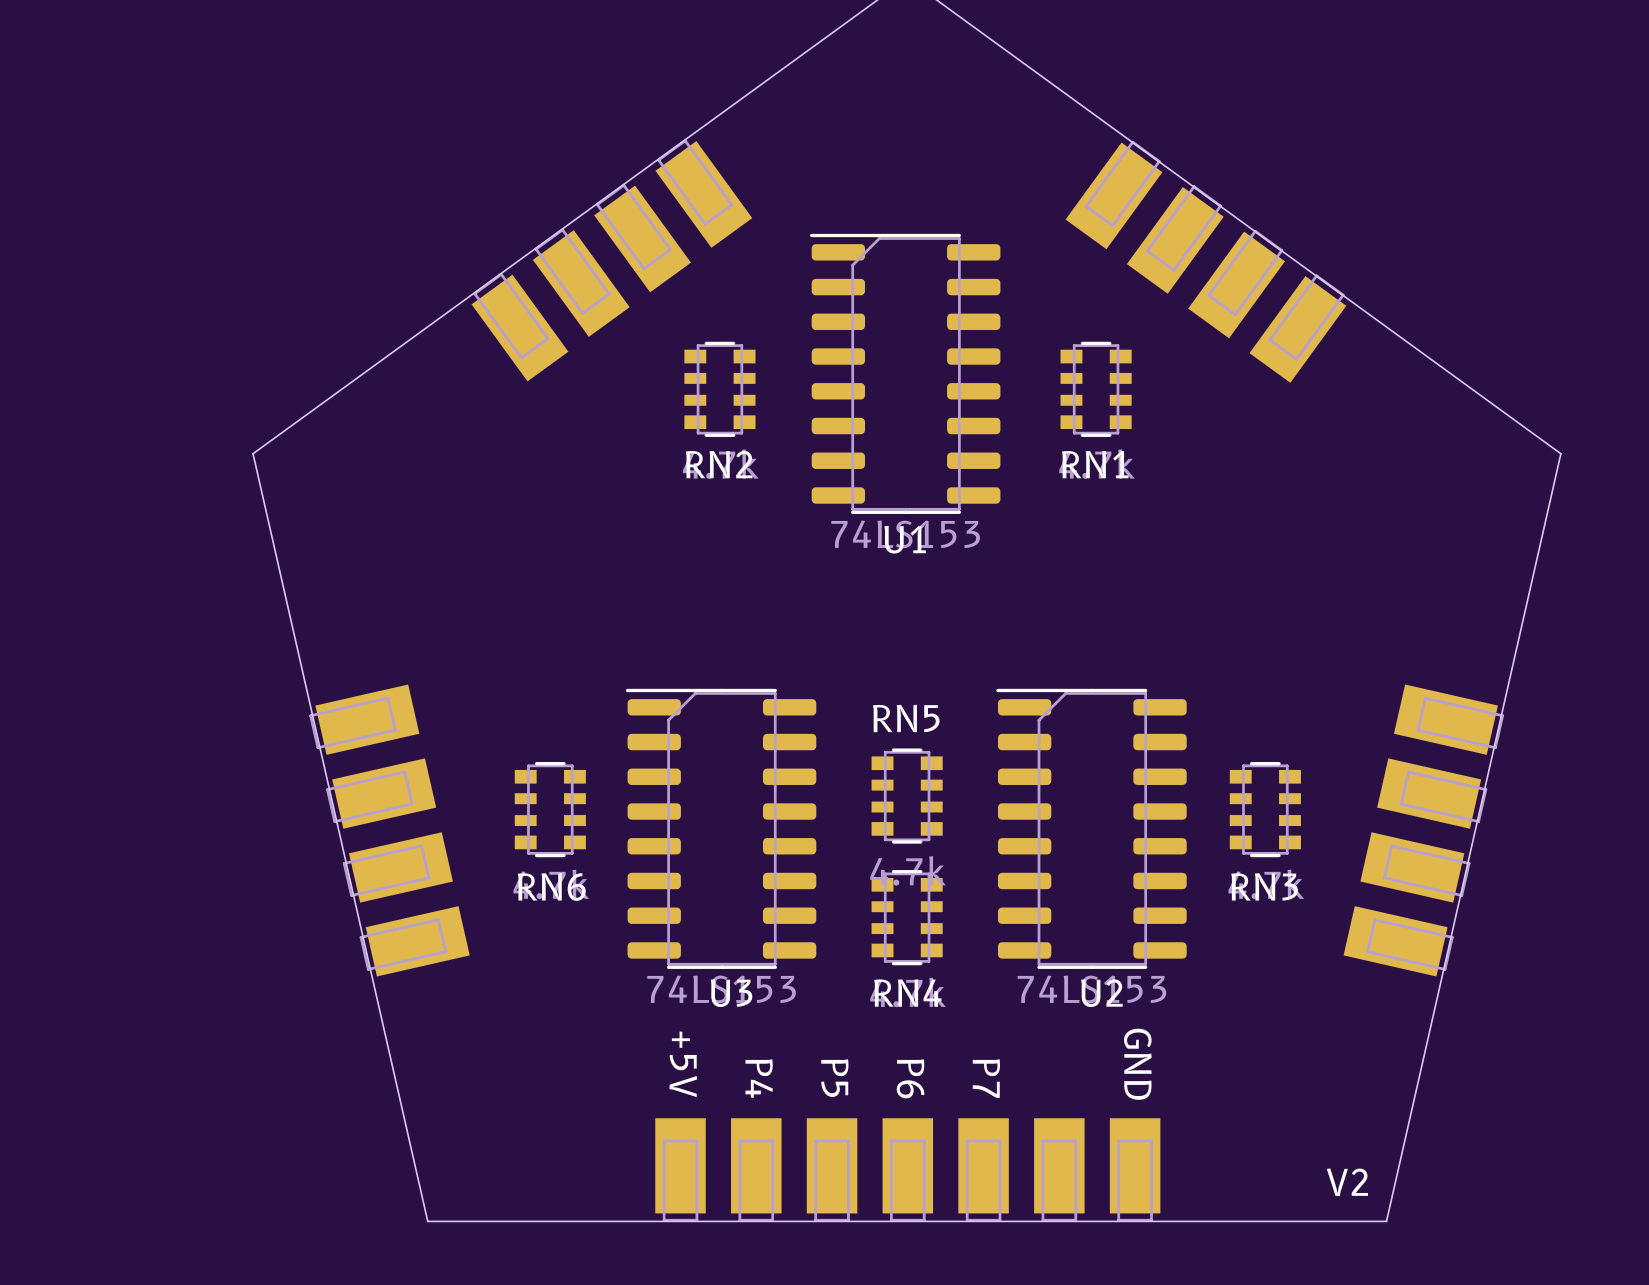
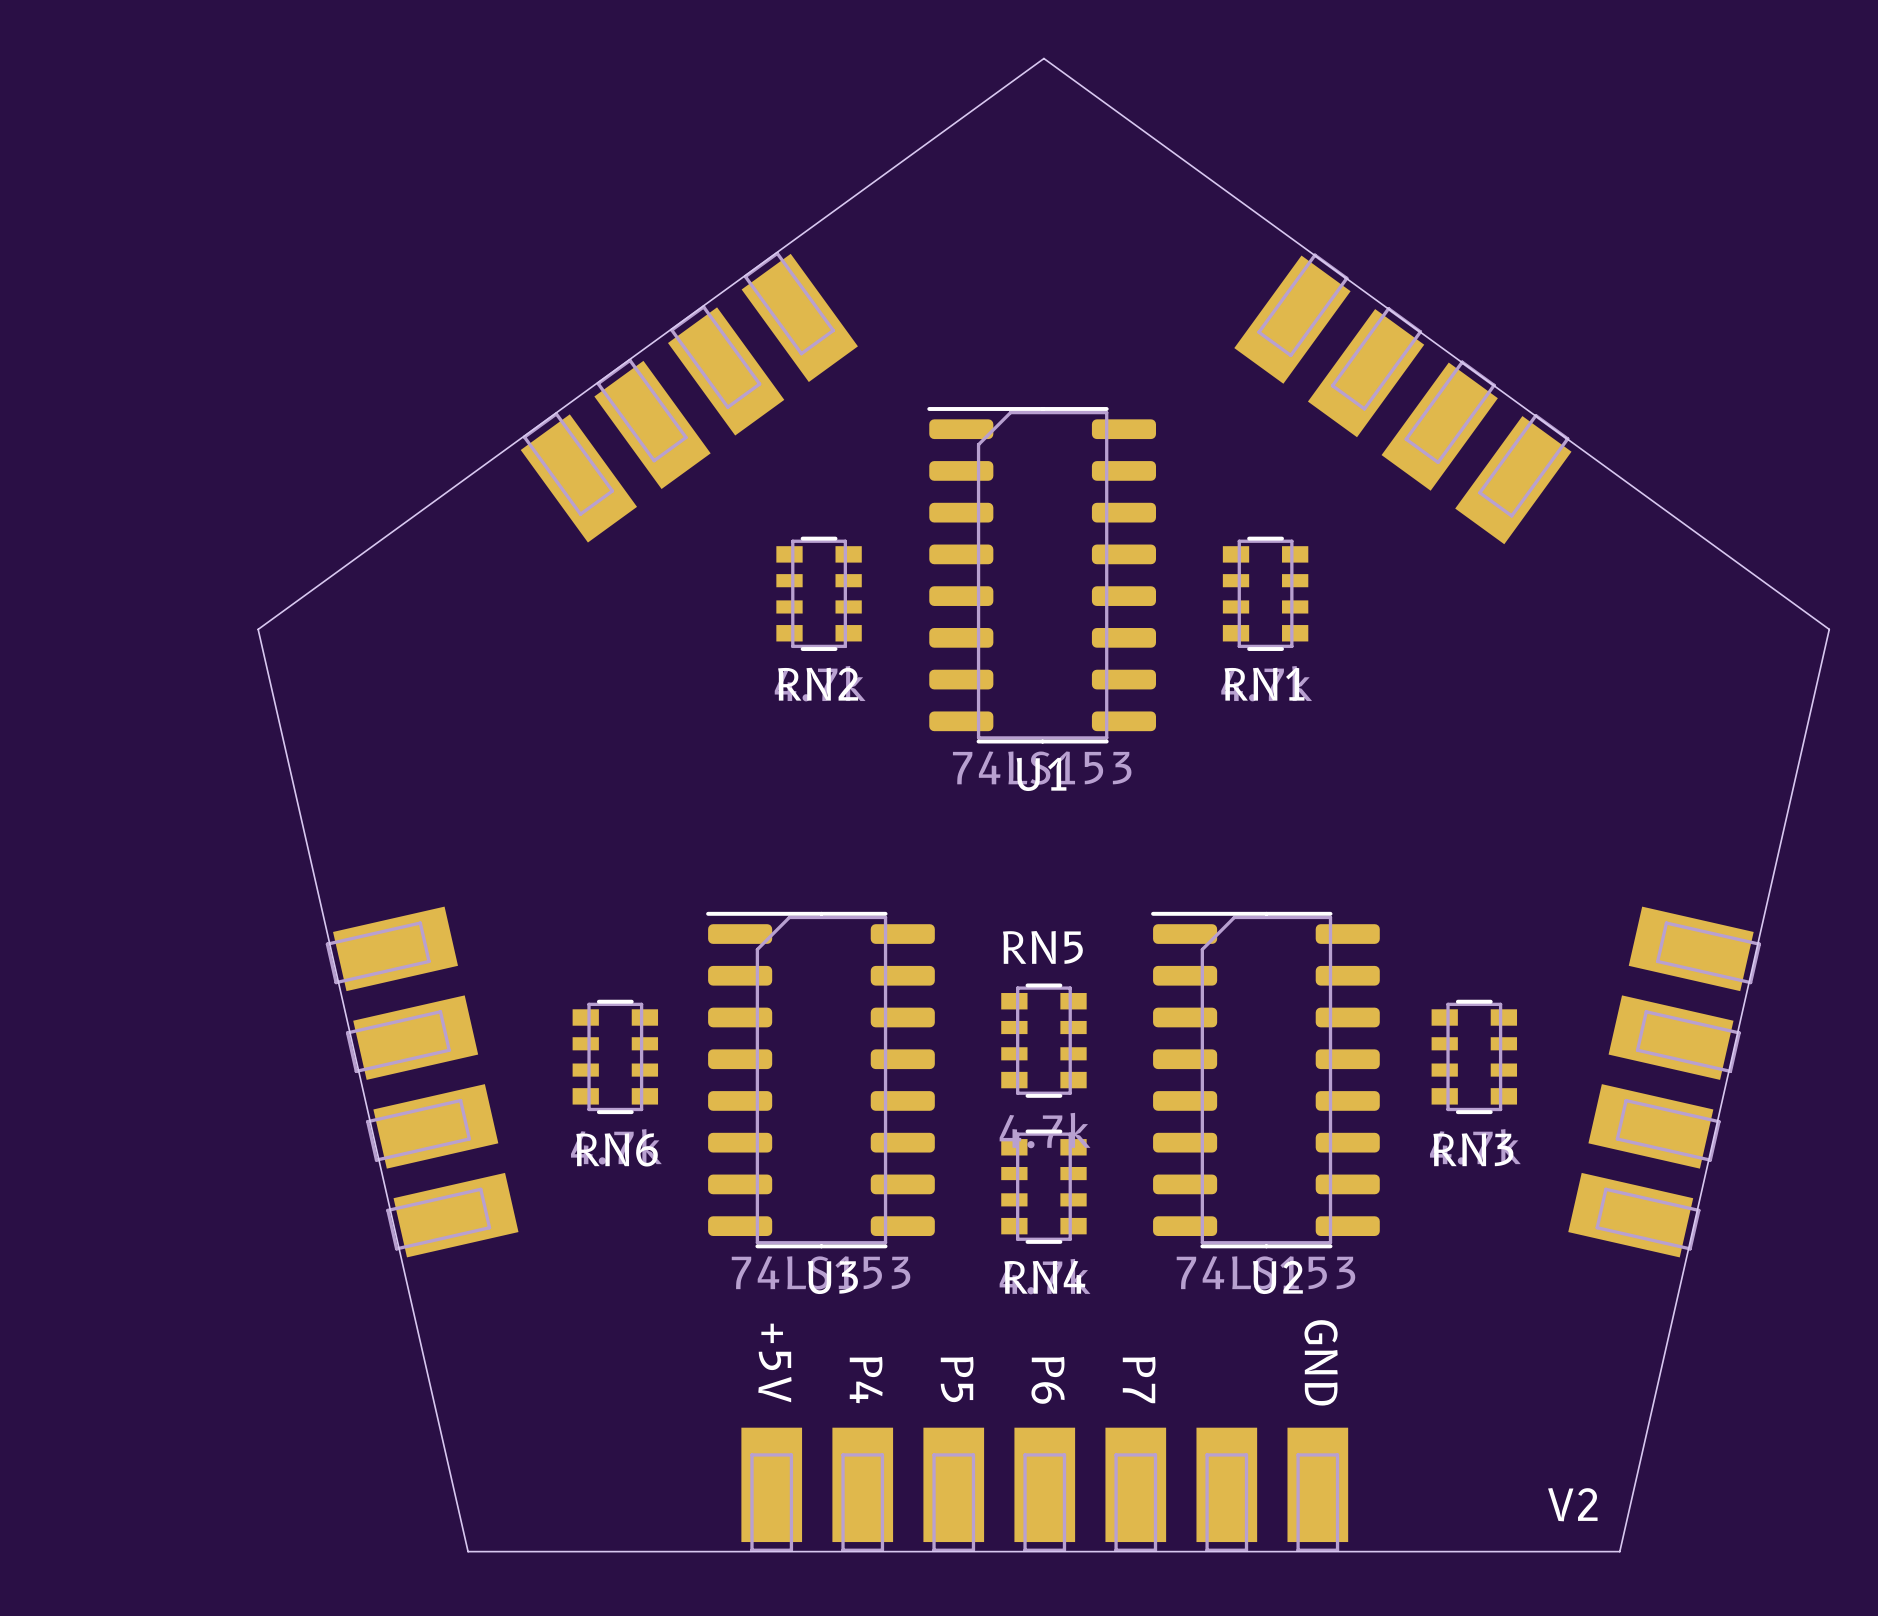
U1 position: (905, 373) -> (1041, 575)
RN2 position: (719, 389) -> (819, 593)
RN1 position: (1096, 389) -> (1265, 593)

